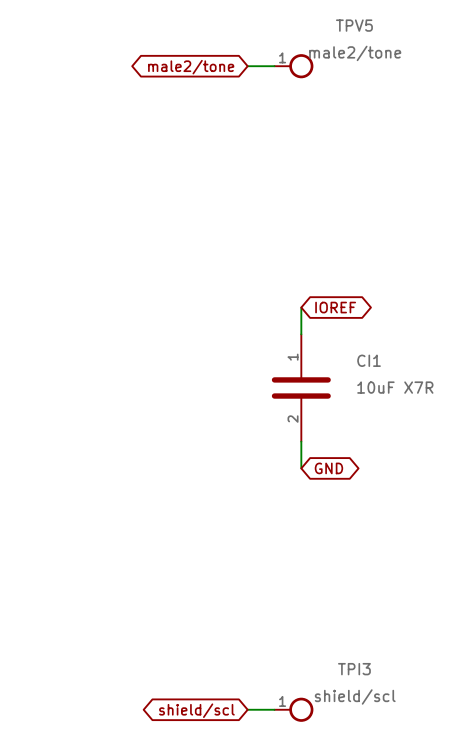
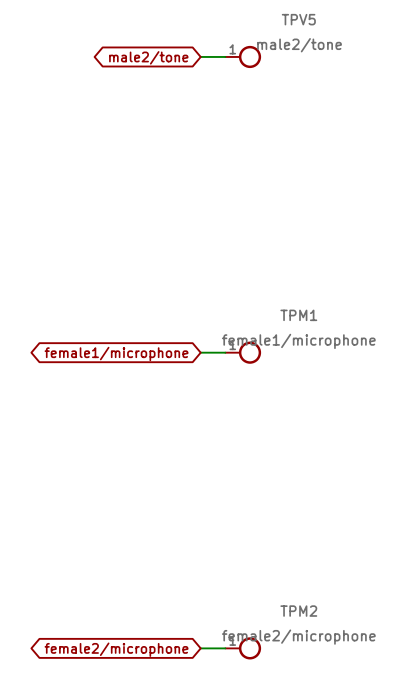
wire: (301, 307) (301, 334) -> none
global label: IOREF (335, 307) -> none
wire: none -> (200, 352) (225, 352)
TPM1: none -> female1/microphone (243, 352)
CI1: 10uF X7R (301, 387) -> none
global label: none -> female1/microphone (116, 354)
wire: (301, 441) (301, 468) -> none
global label: GND (328, 468) -> none
TPI3 name: TPI3 (354, 669) -> TPM2 (298, 611)
TPI3 value: shield/scl (355, 696) -> female2/microphone (298, 637)
global label: shield/scl (196, 710) -> female2/microphone (116, 649)

